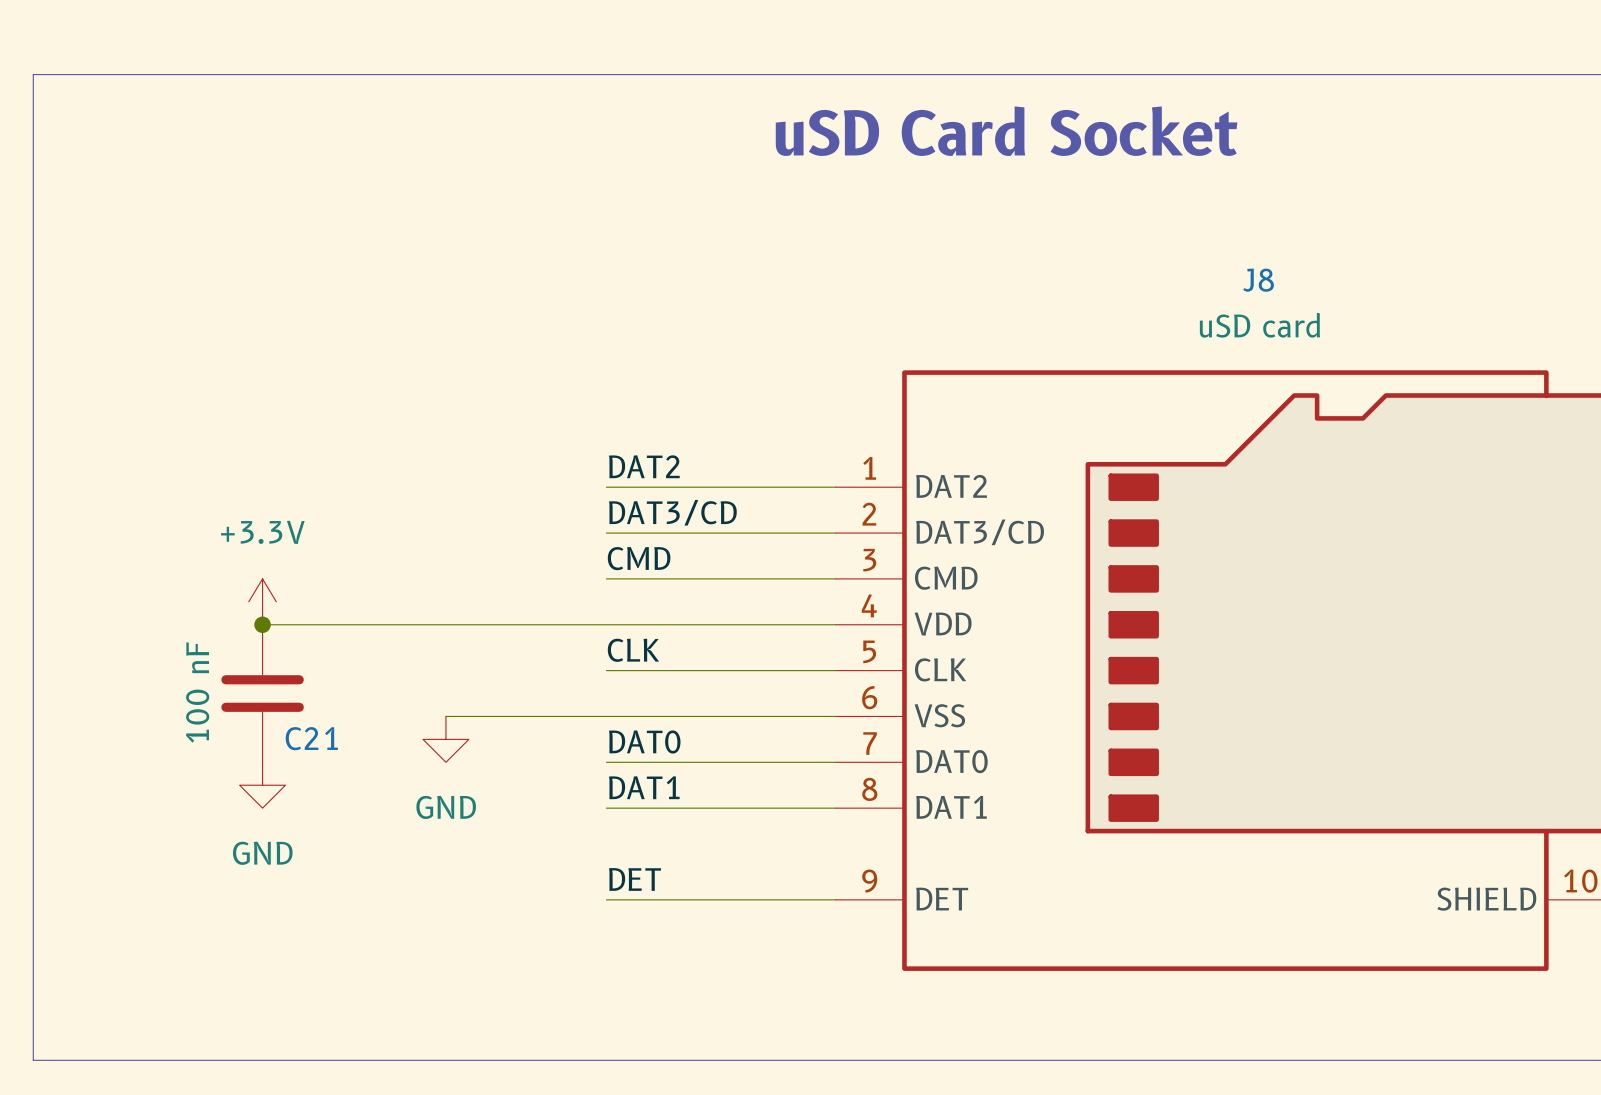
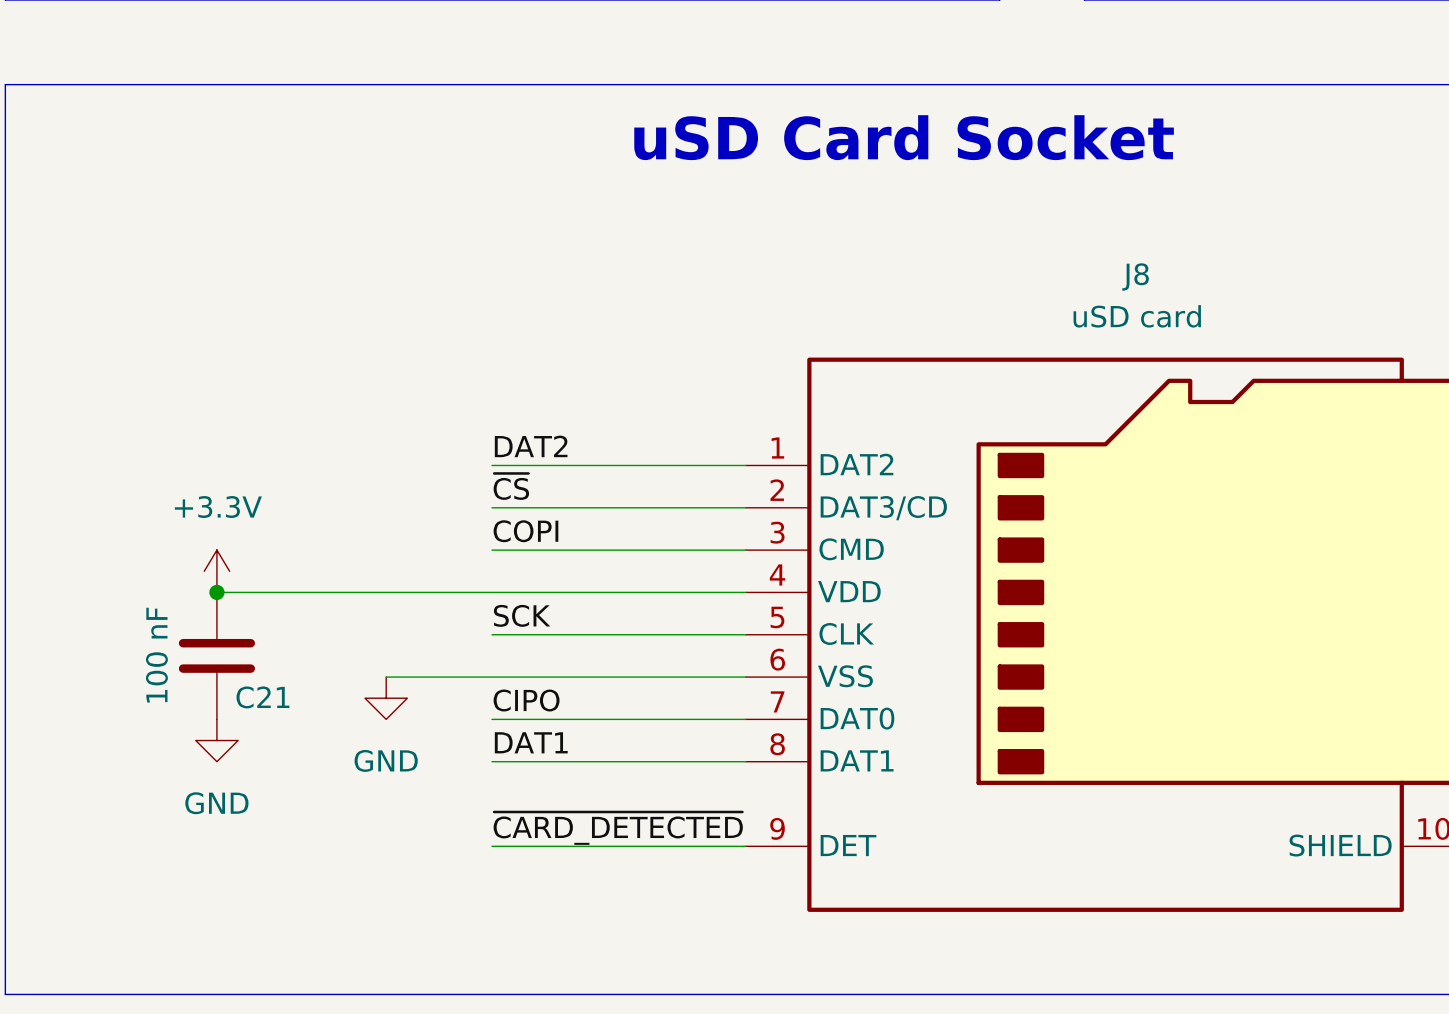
label position: DAT2 (644, 466) -> DAT2 (531, 446)
wire: none -> (491, 465) (534, 465)
label: none -> ~{CS} (511, 486)
label: DAT3/CD (672, 512) -> none
wire: none -> (491, 507) (534, 507)
label: none -> COPI (525, 531)
label: CMD (639, 558) -> none
wire: none -> (491, 550) (534, 550)
label: CLK (633, 650) -> SCK (522, 615)
wire: none -> (491, 634) (534, 634)
label: none -> CIPO (526, 700)
label: DAT0 (644, 741) -> none
wire: none -> (491, 719) (534, 719)
label position: DAT1 (644, 787) -> DAT1 (531, 742)
wire: none -> (491, 761) (534, 761)
label: DET (634, 879) -> none
label: none -> ~{CARD_DETECTED} (618, 828)
wire: none -> (491, 846) (534, 846)

